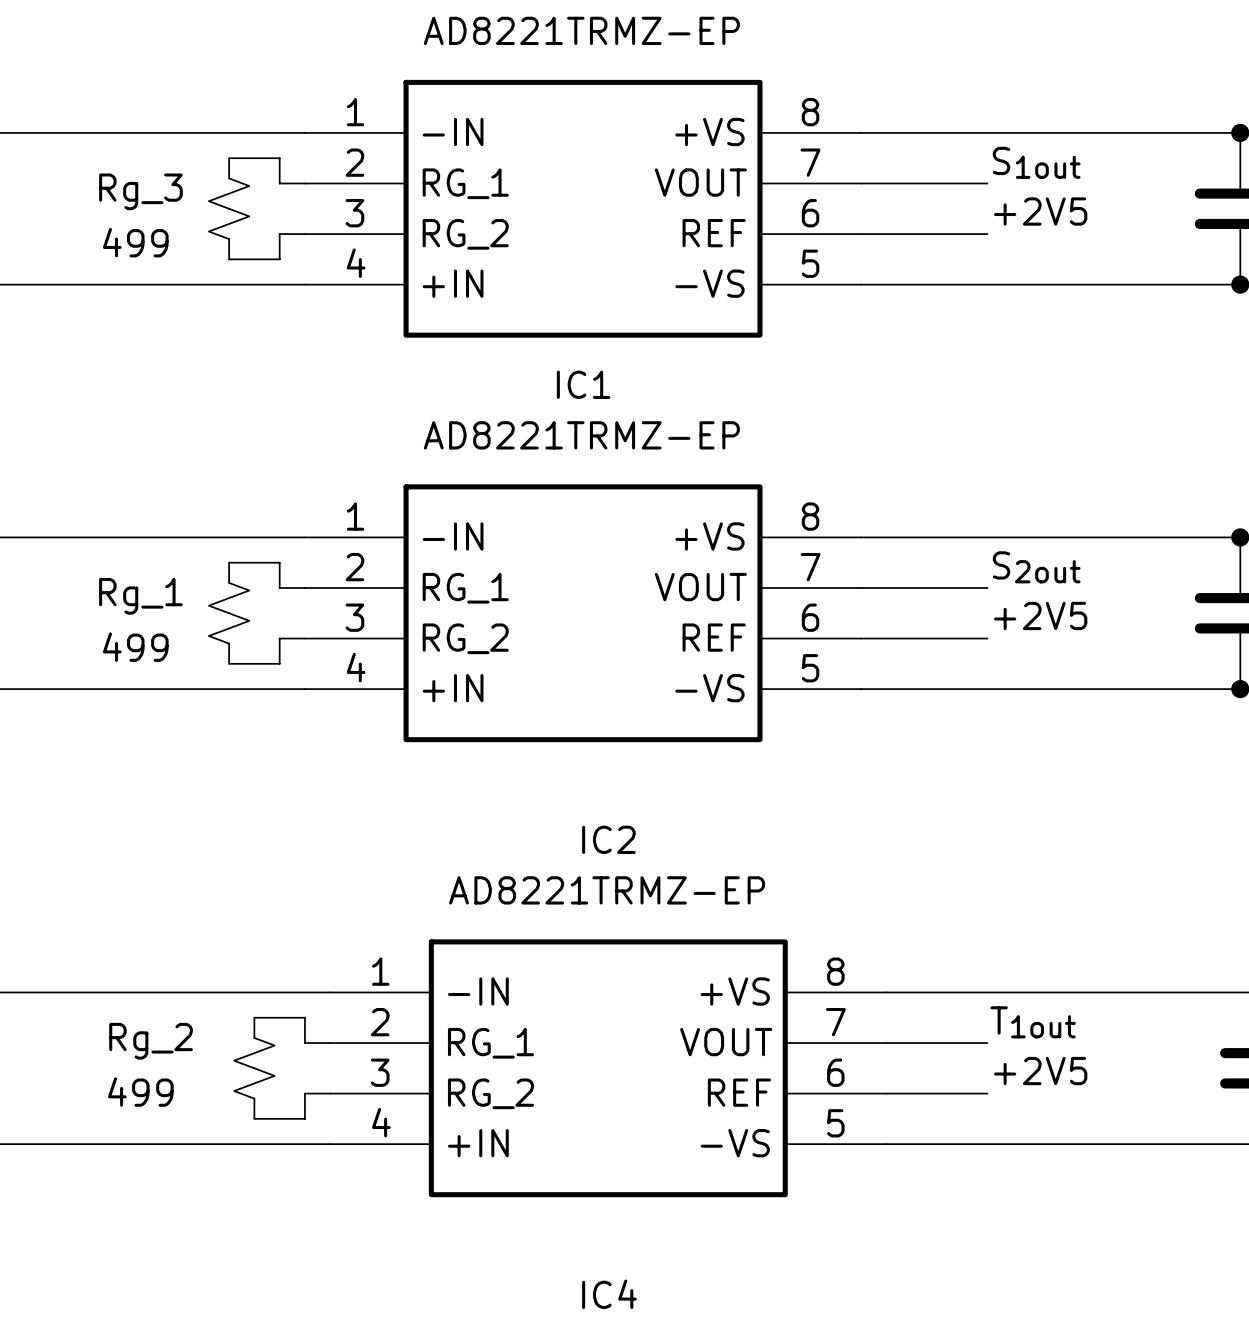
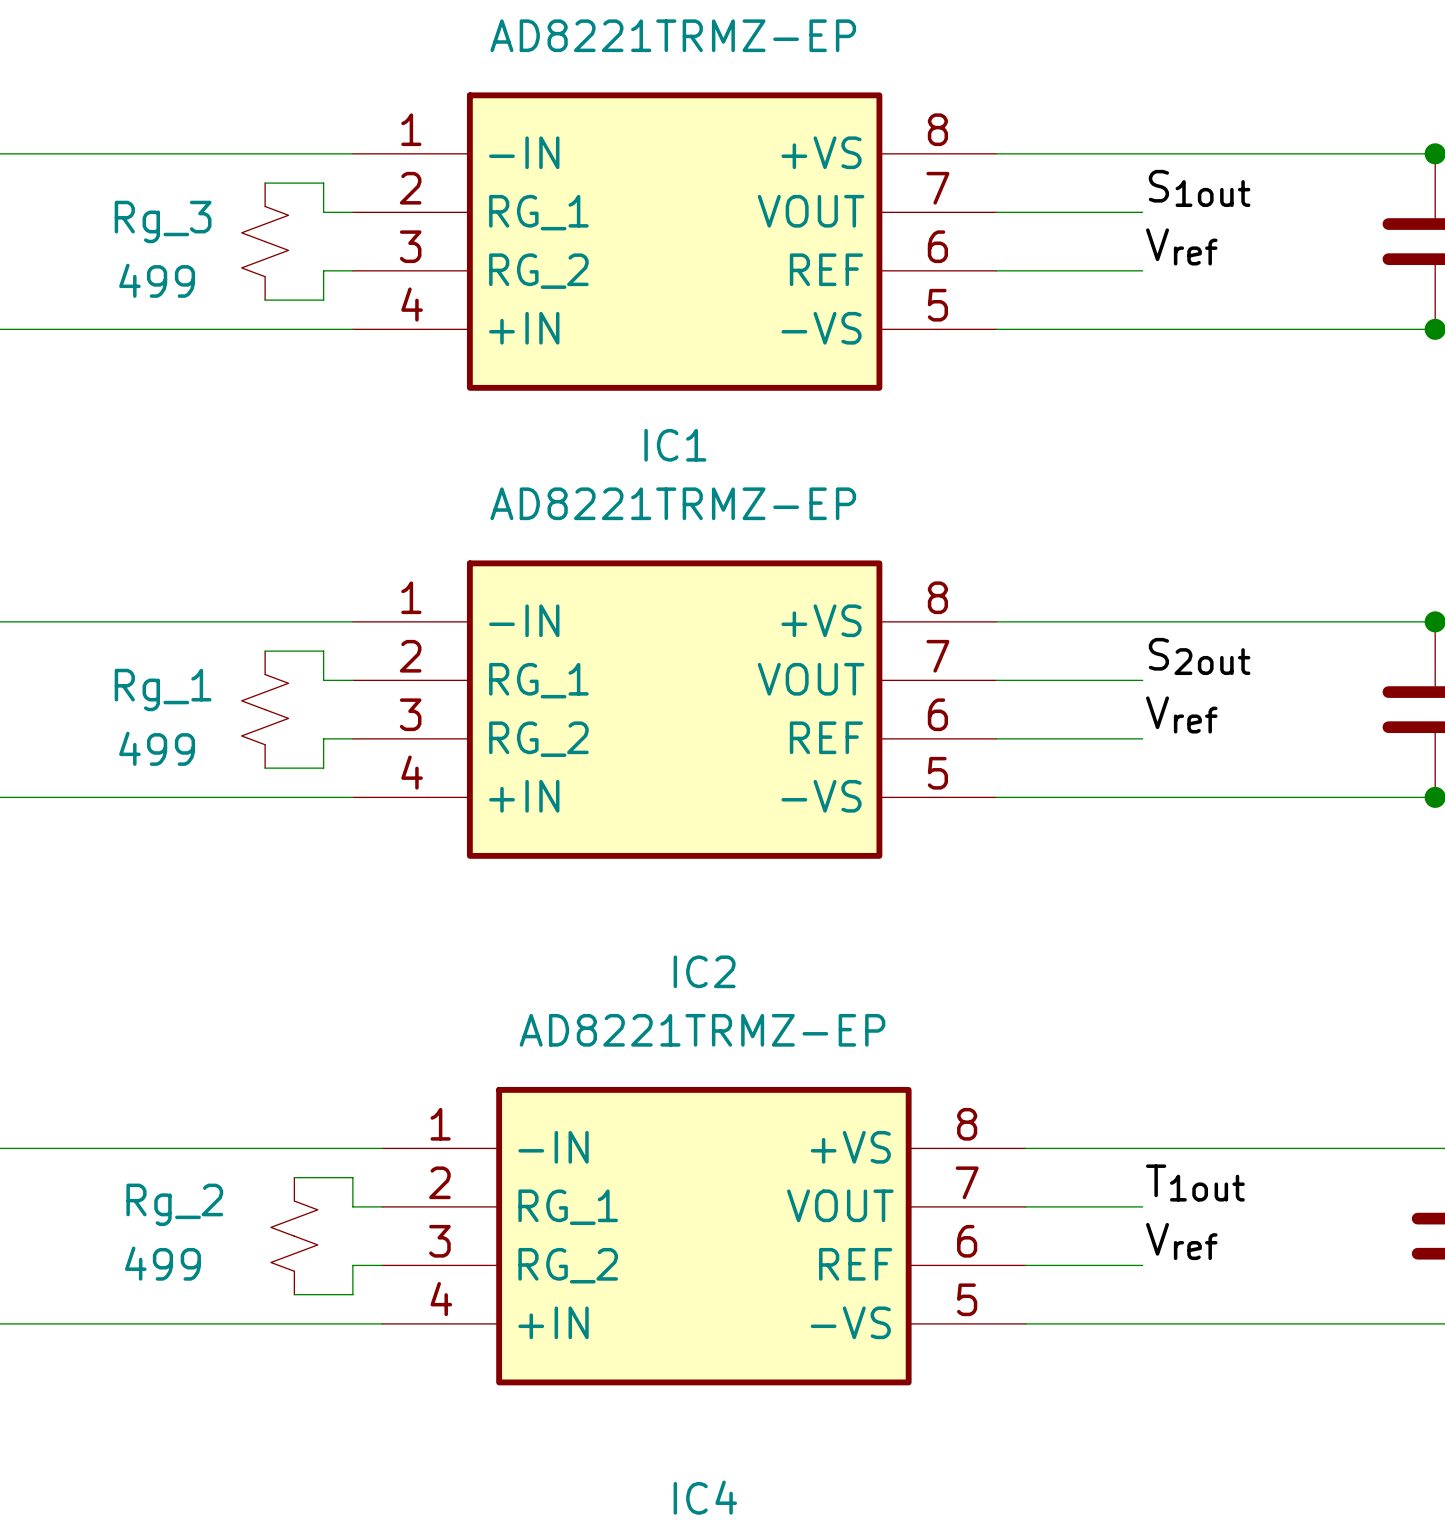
label: +2V5 (1040, 211) -> Vref (1181, 246)
label: +2V5 (1040, 615) -> Vref (1181, 714)
label: +2V5 (1040, 1071) -> Vref (1181, 1241)

